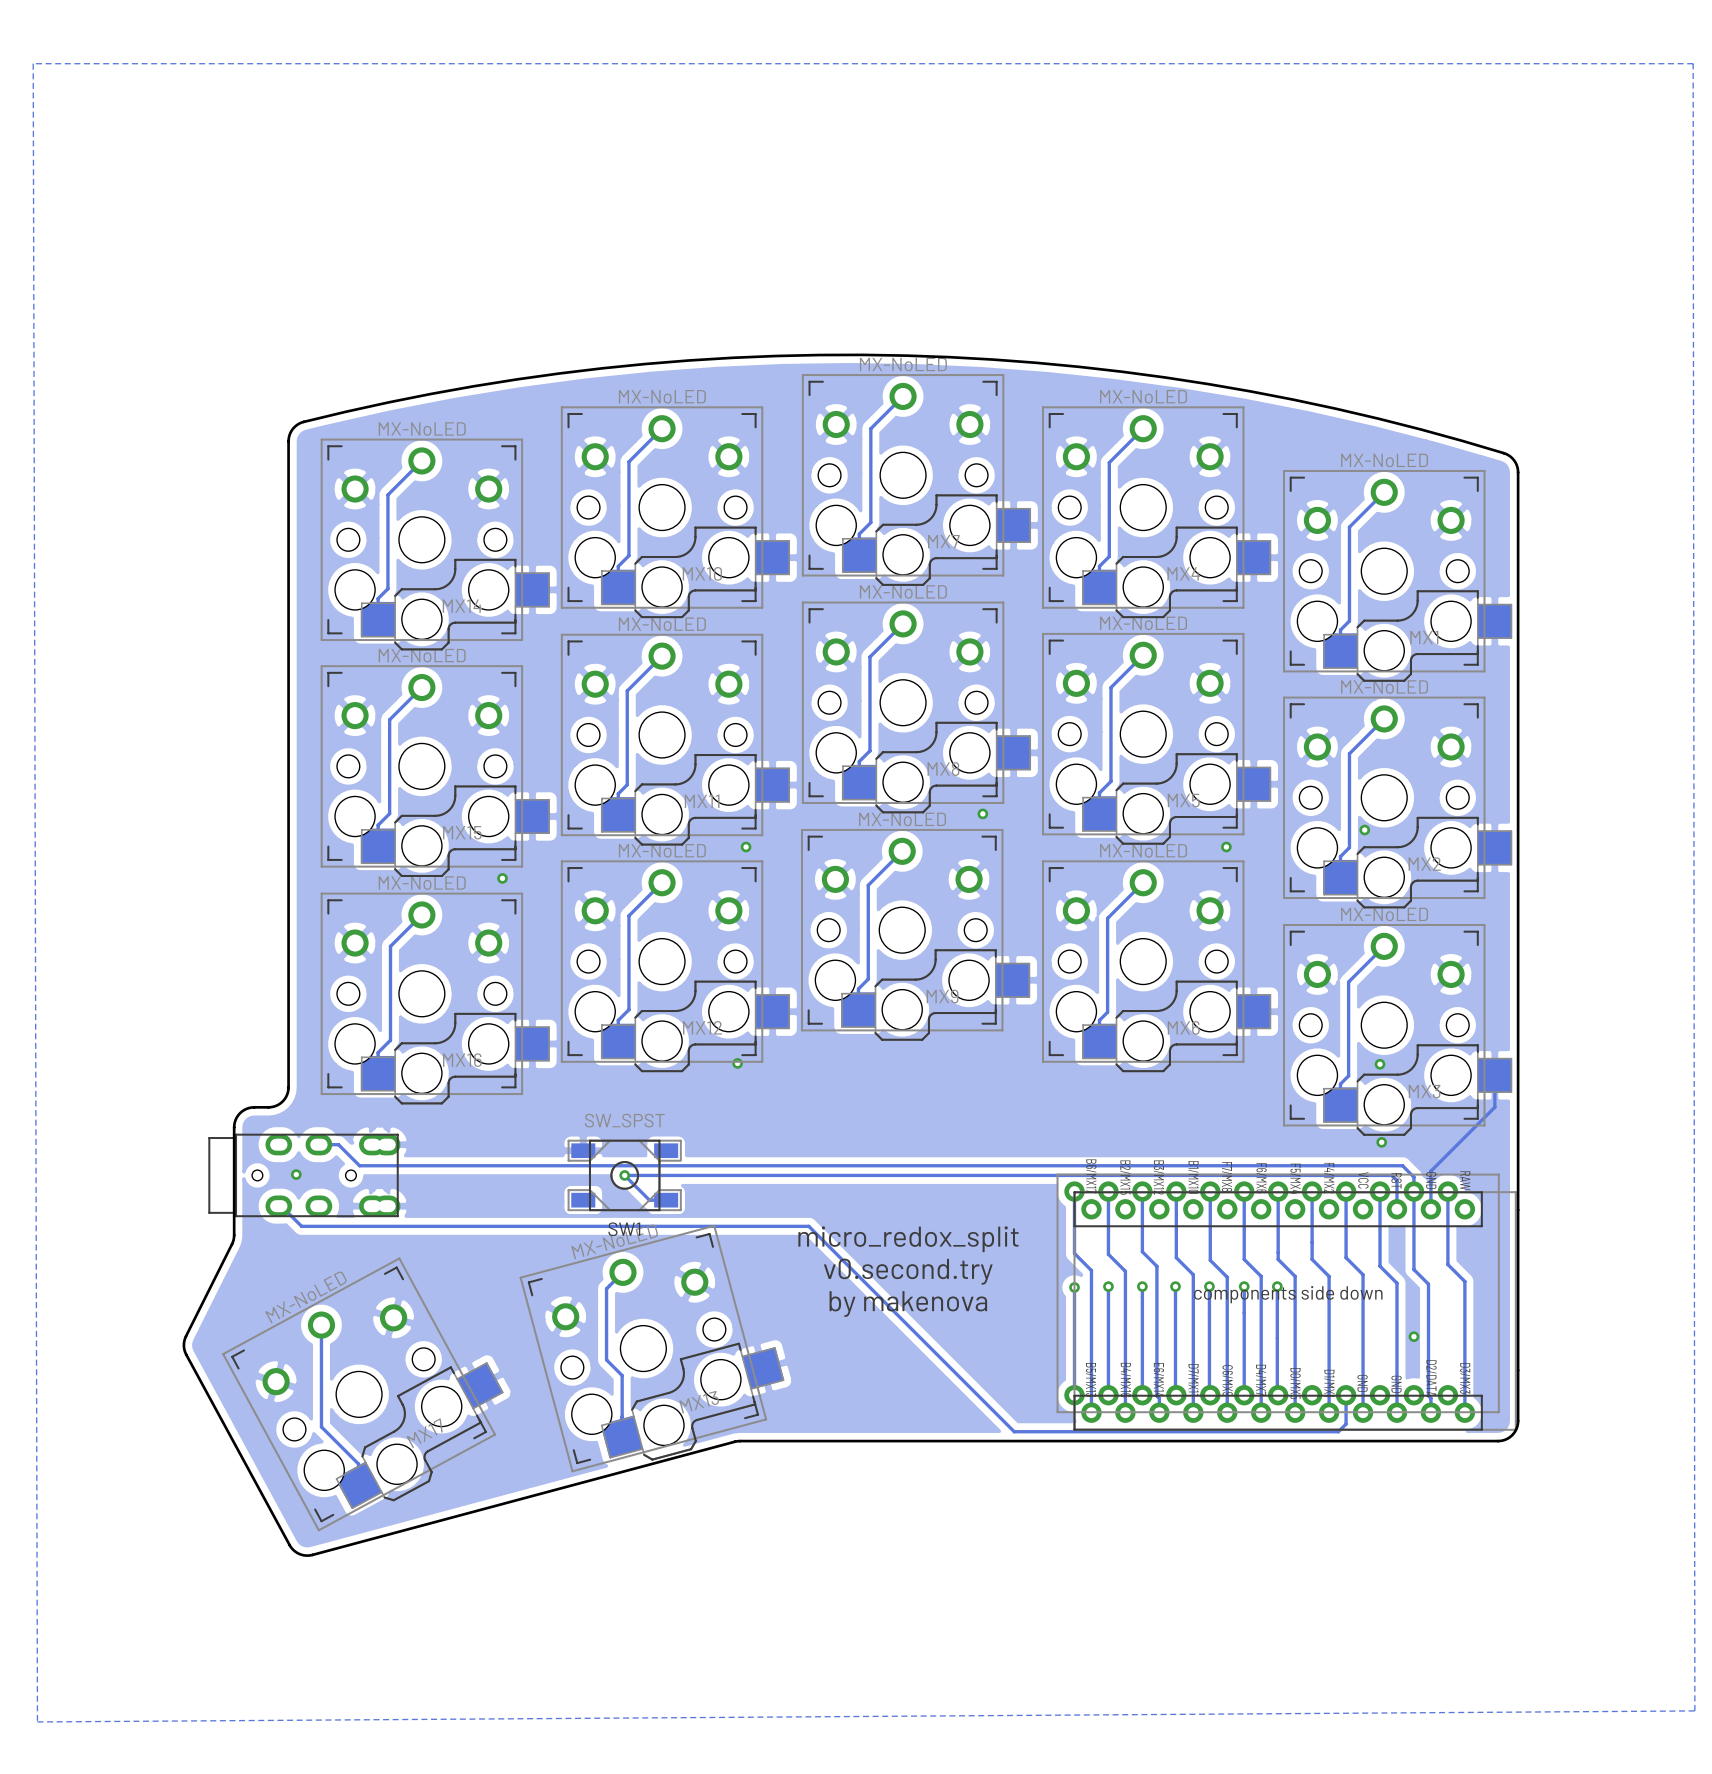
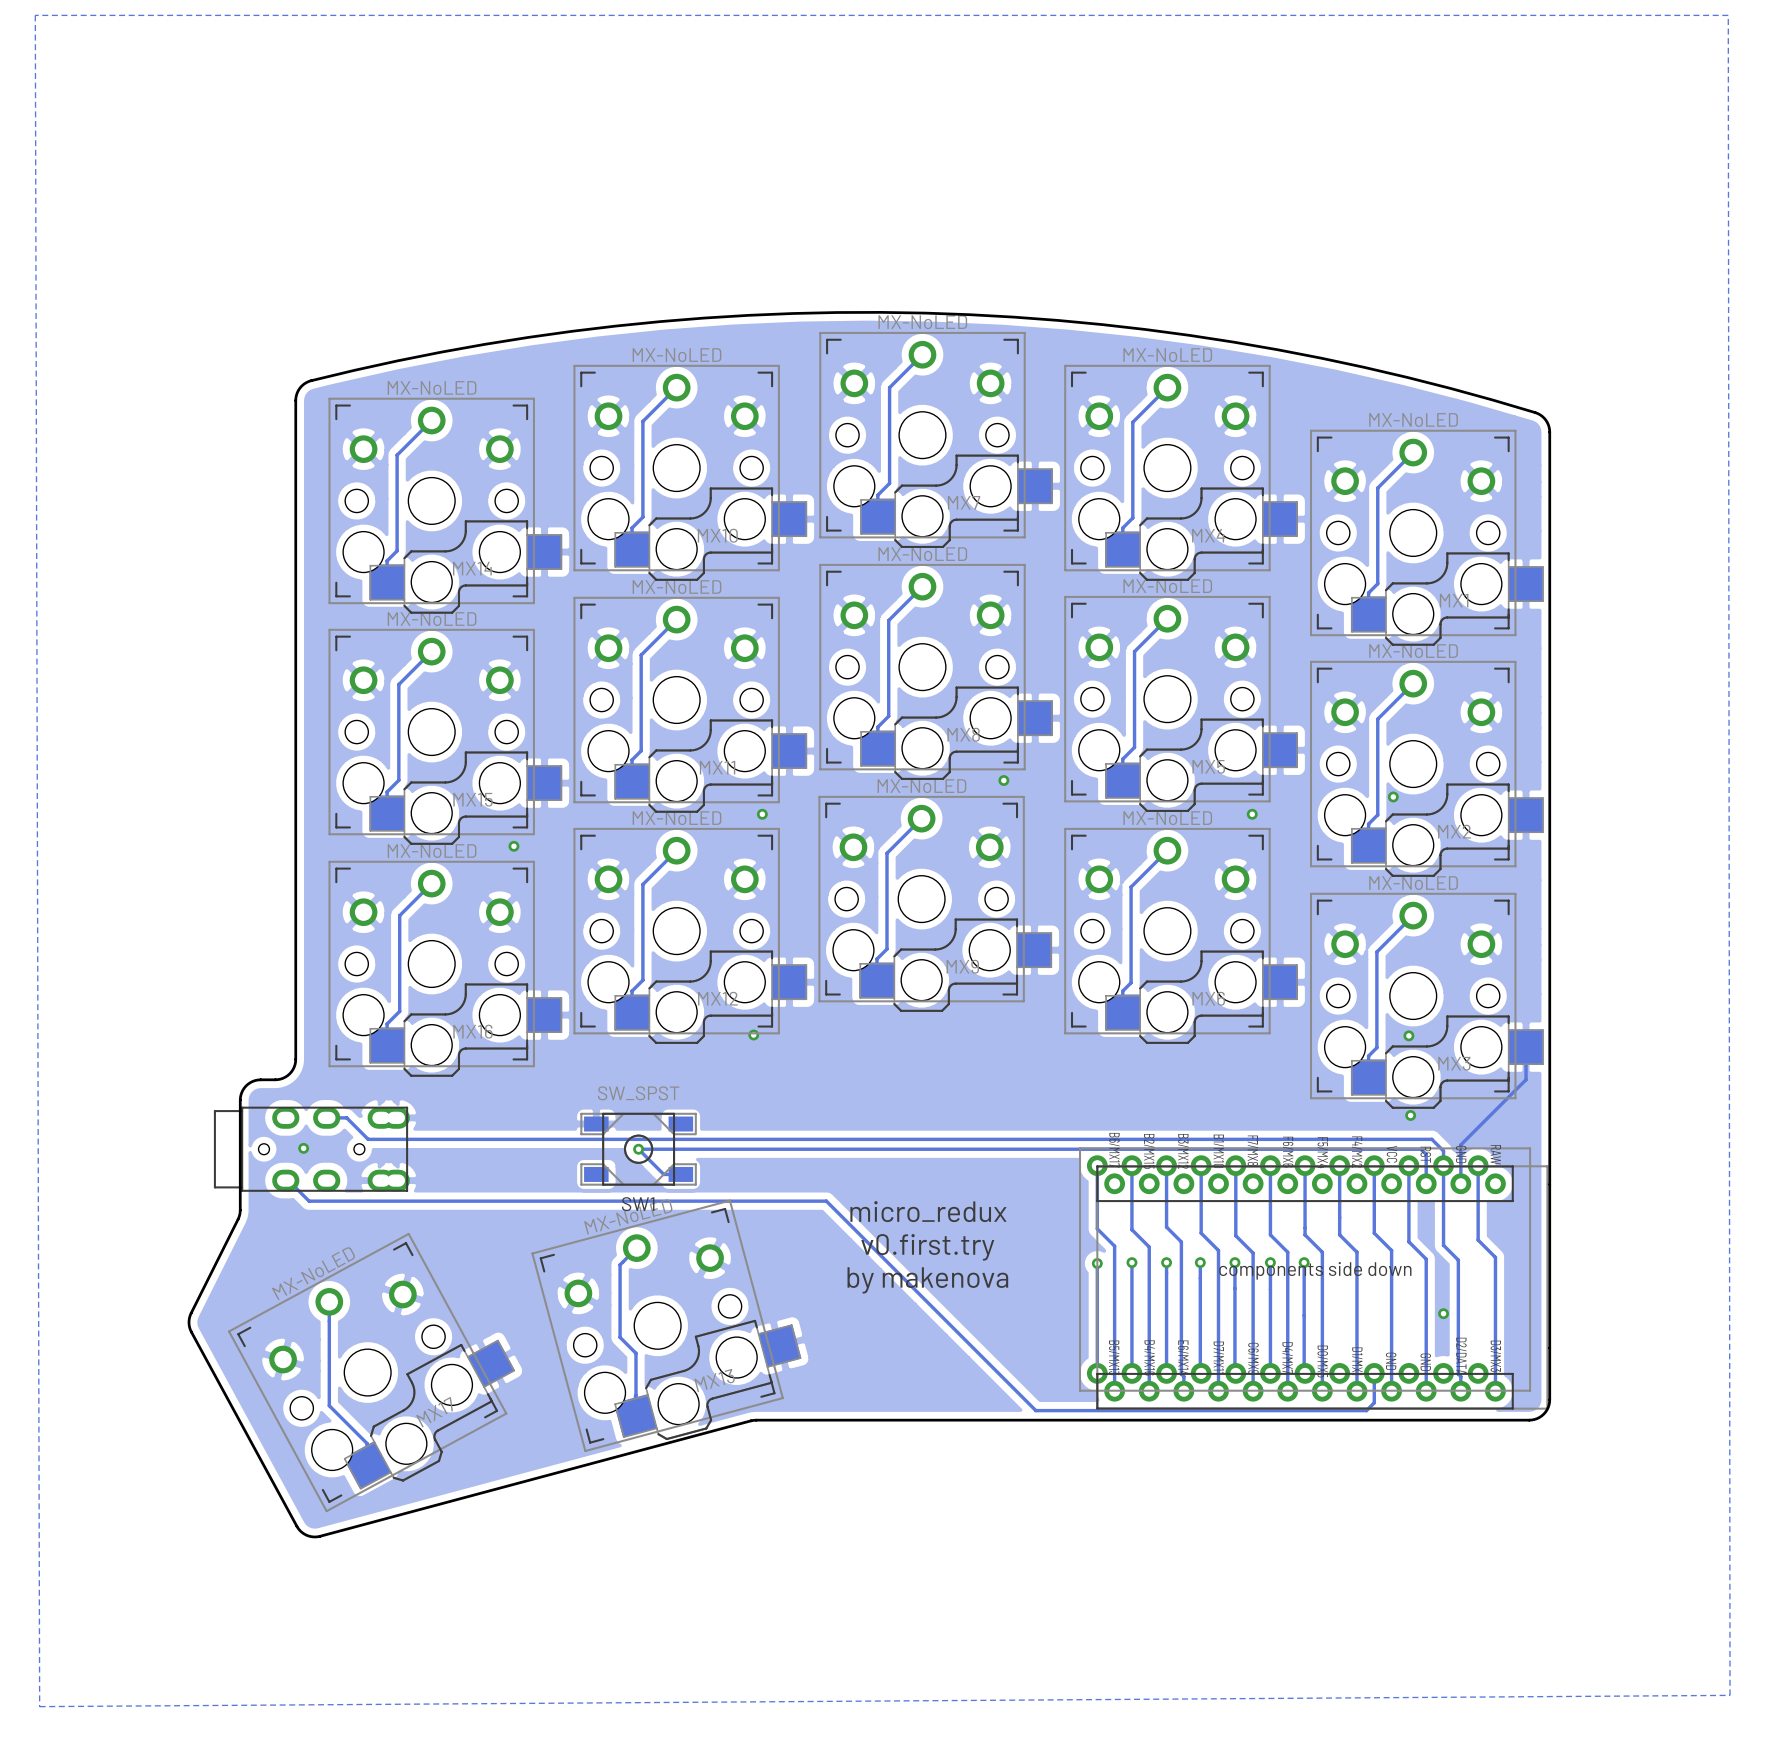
text: micro_redox_split (908, 1239) -> micro_redux (928, 1211)
text: v0.second.try (908, 1271) -> v0.first.try (927, 1247)

